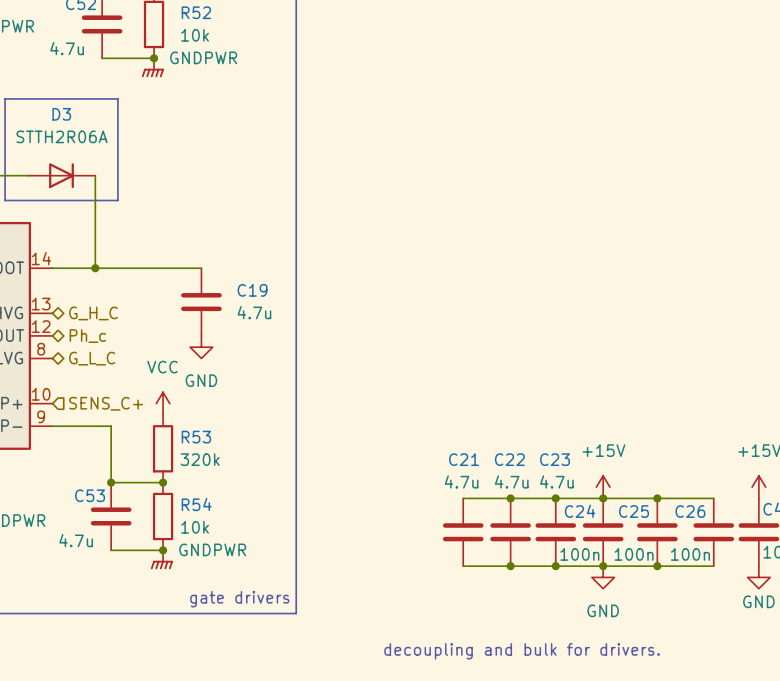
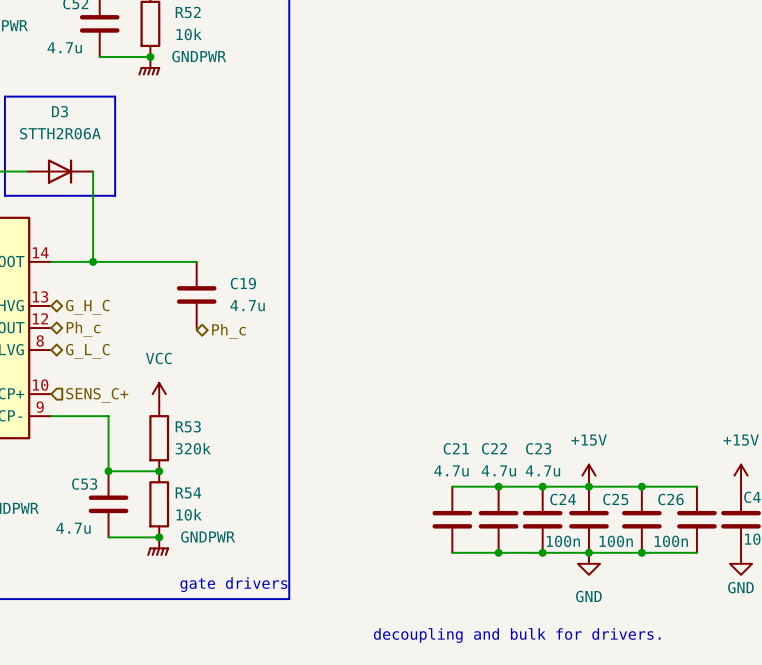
hierarchical label: none -> Ph_c (228, 331)
power symbol: GND (201, 347) -> none

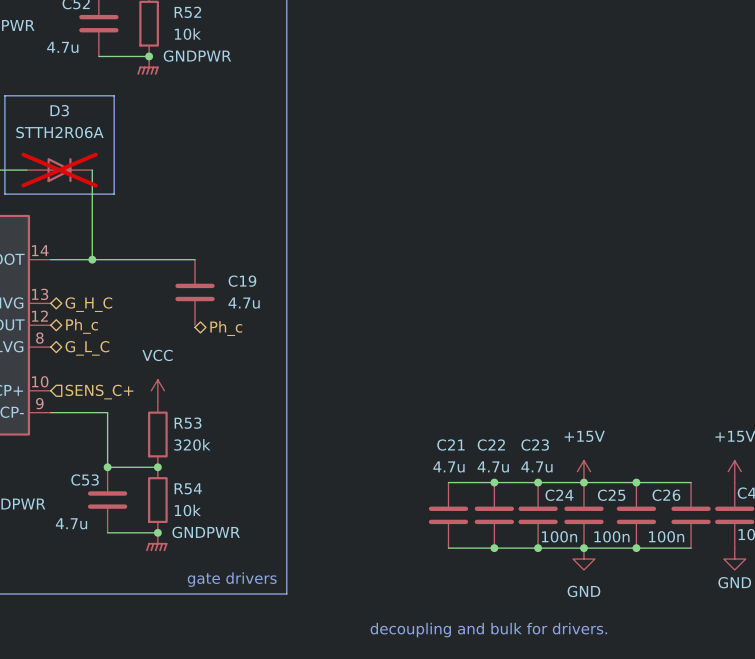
D3 do-not-place cross: none -> (59, 170)

